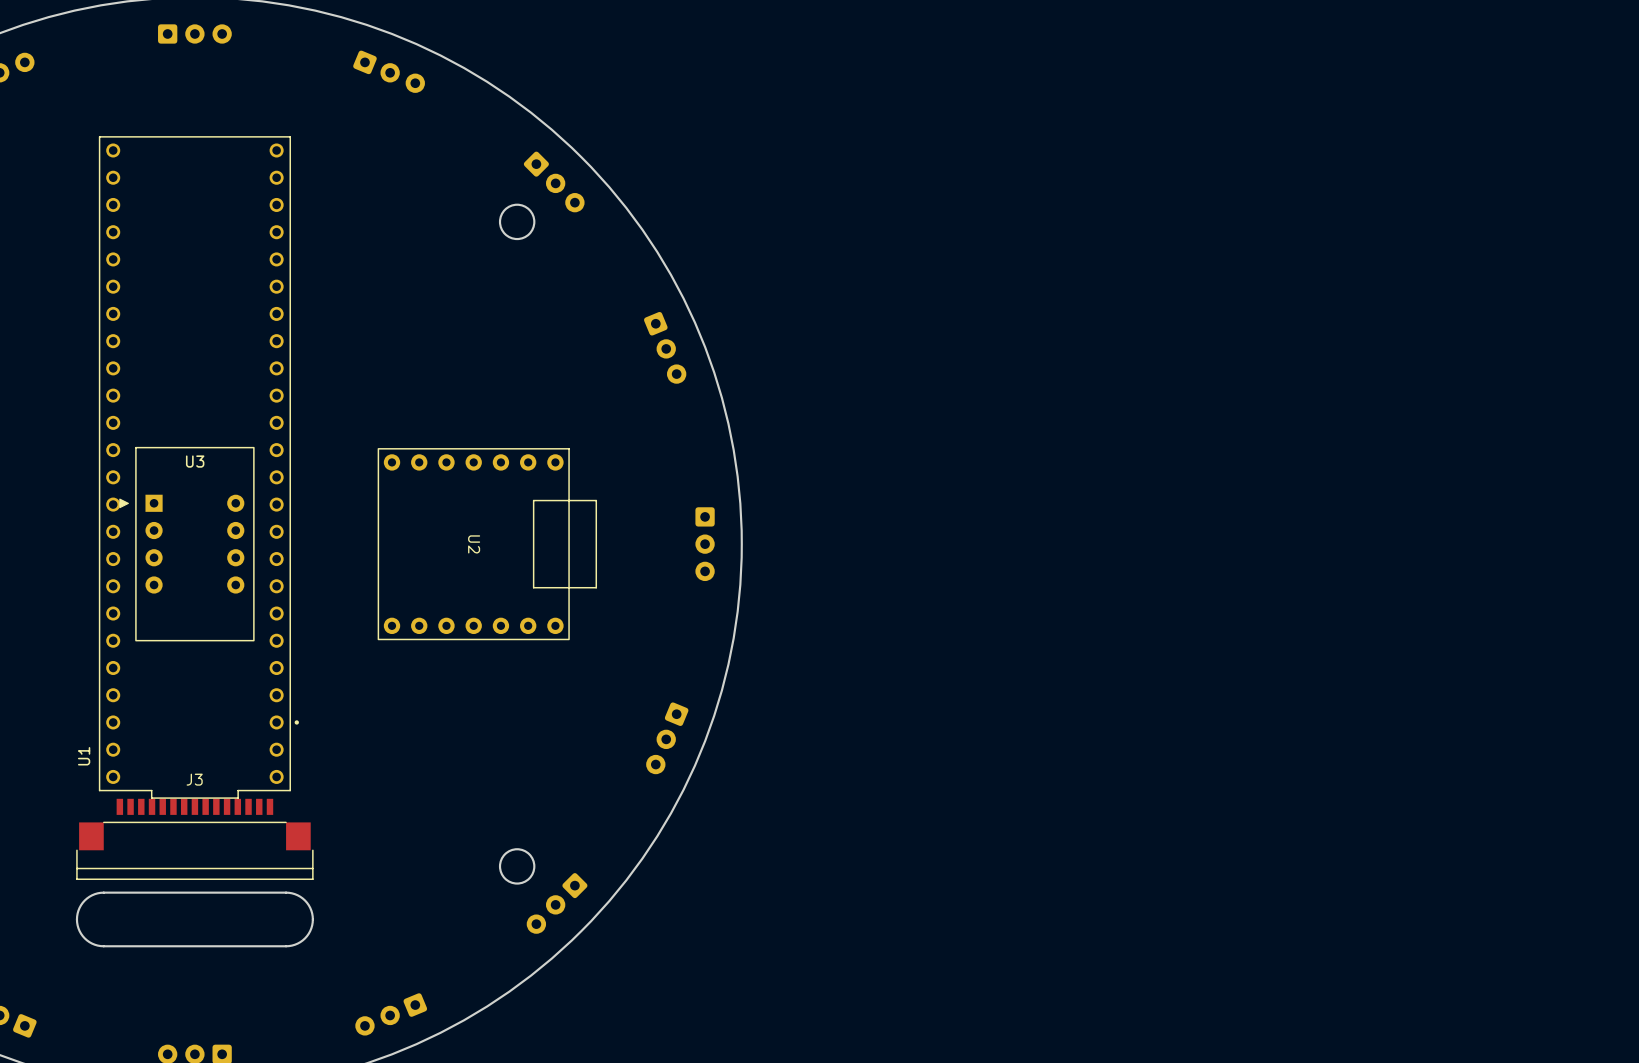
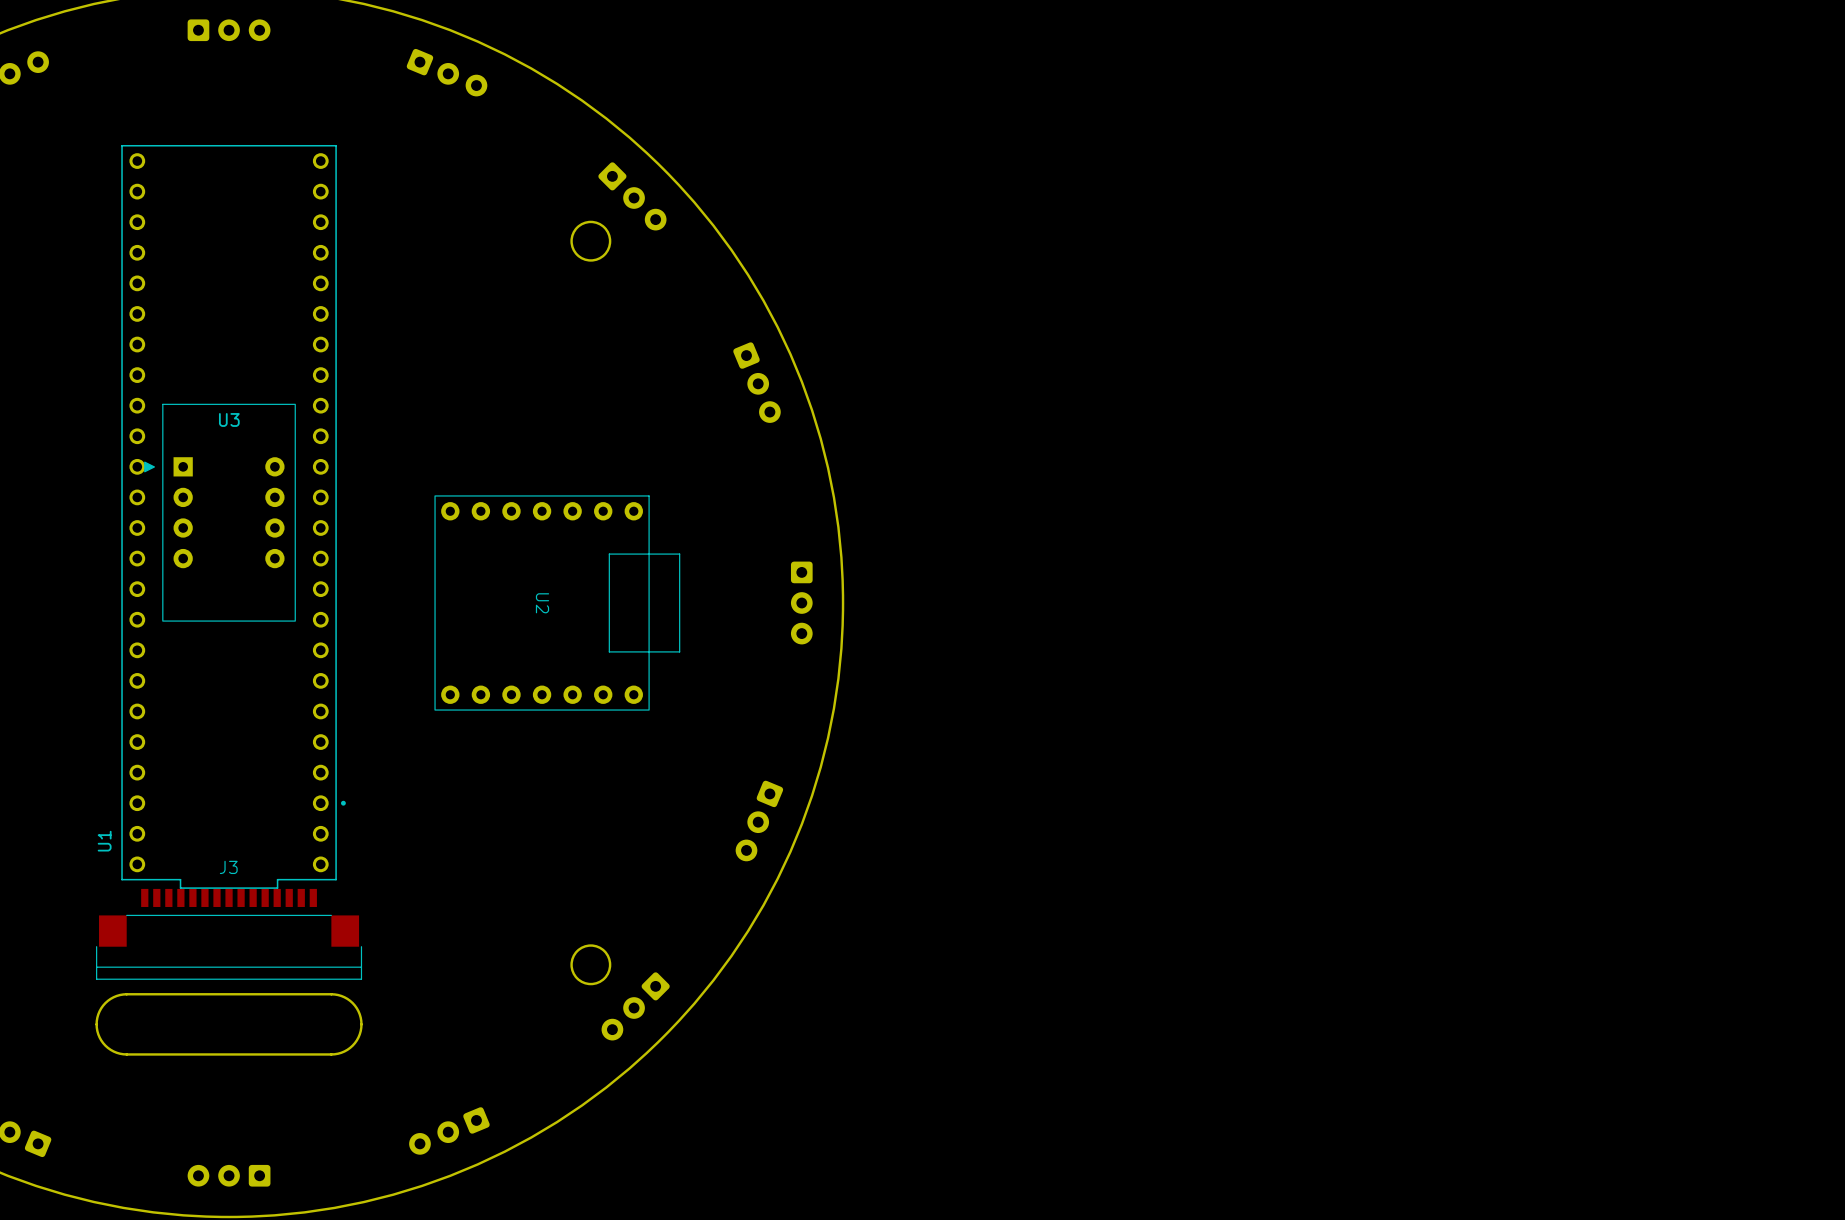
U3 position: (186, 544) -> (220, 512)

